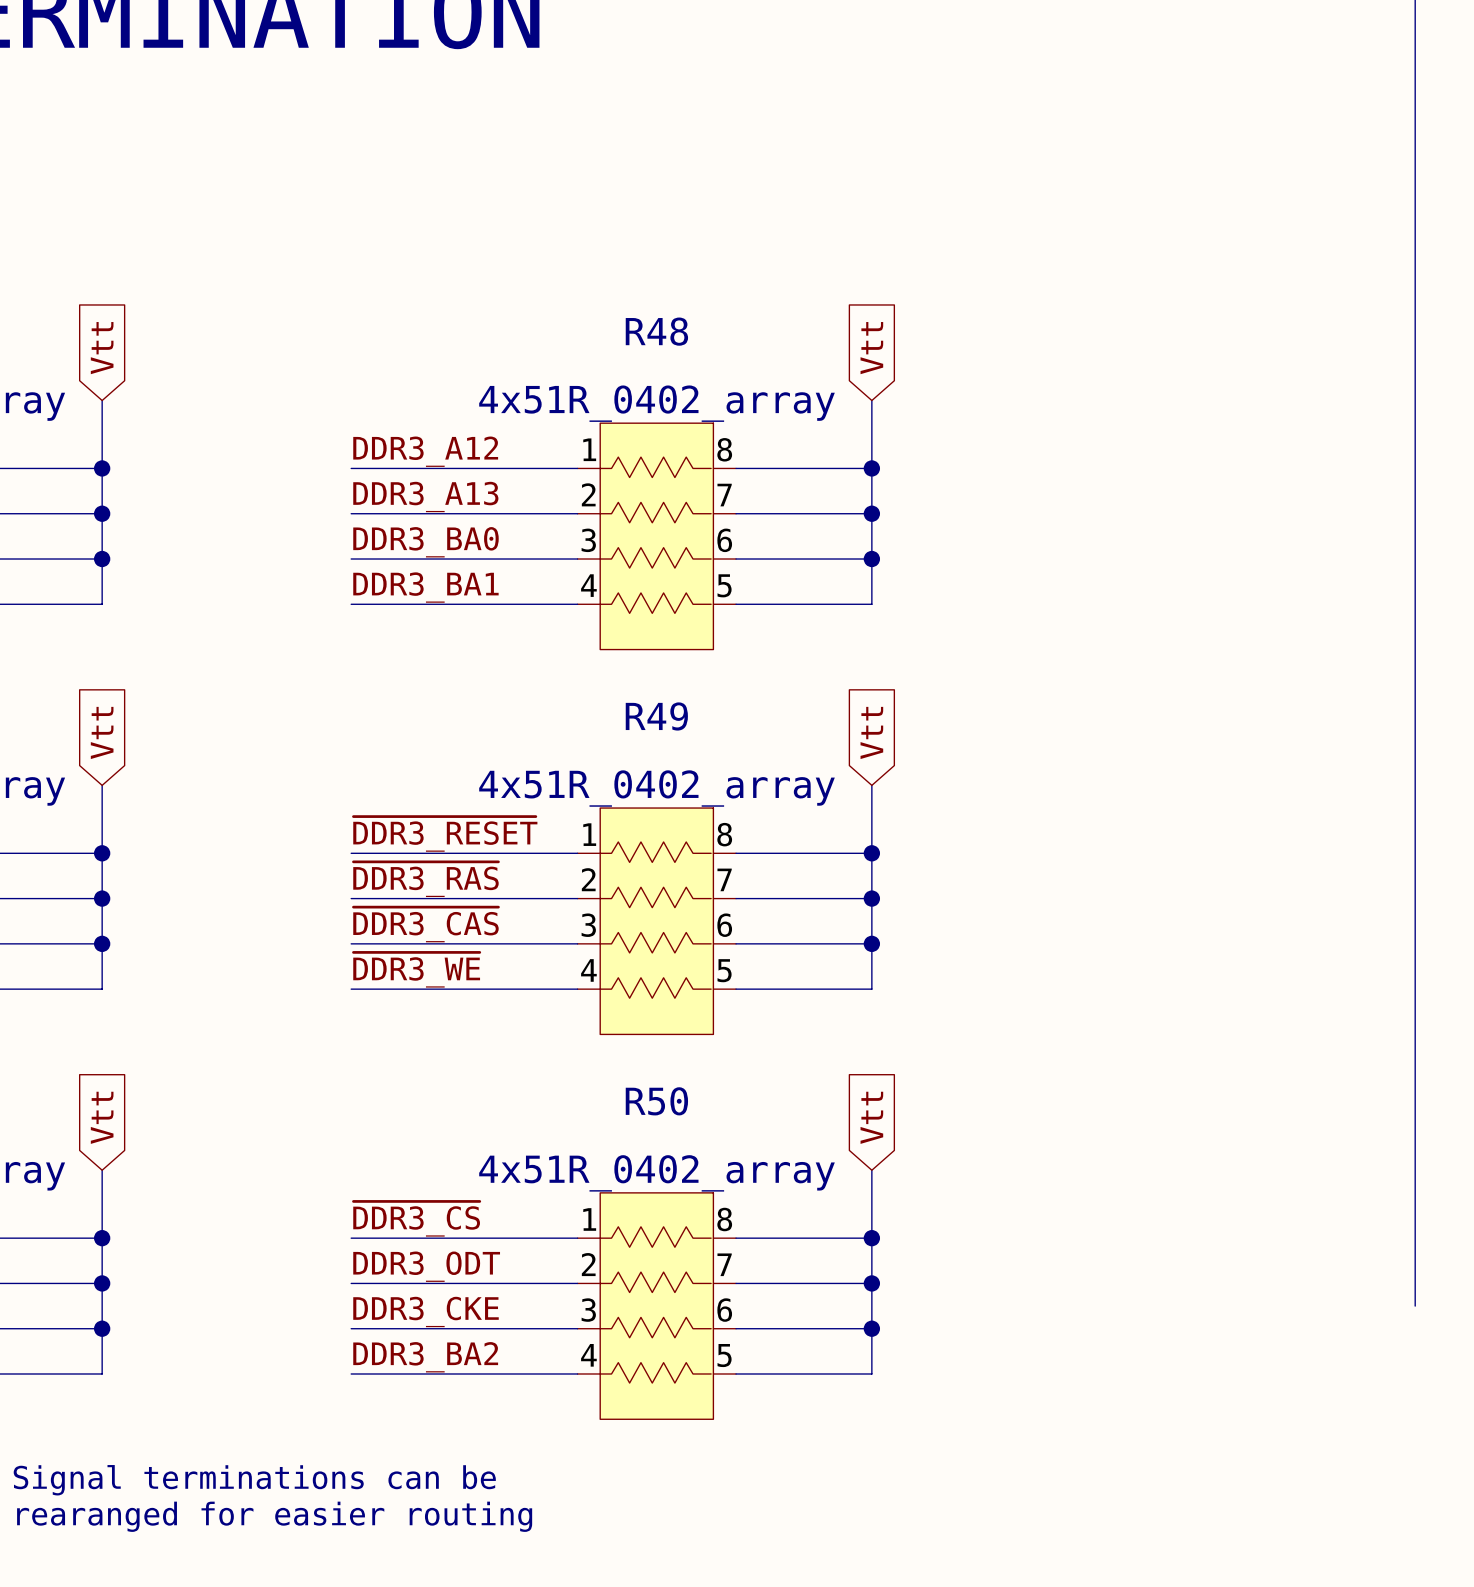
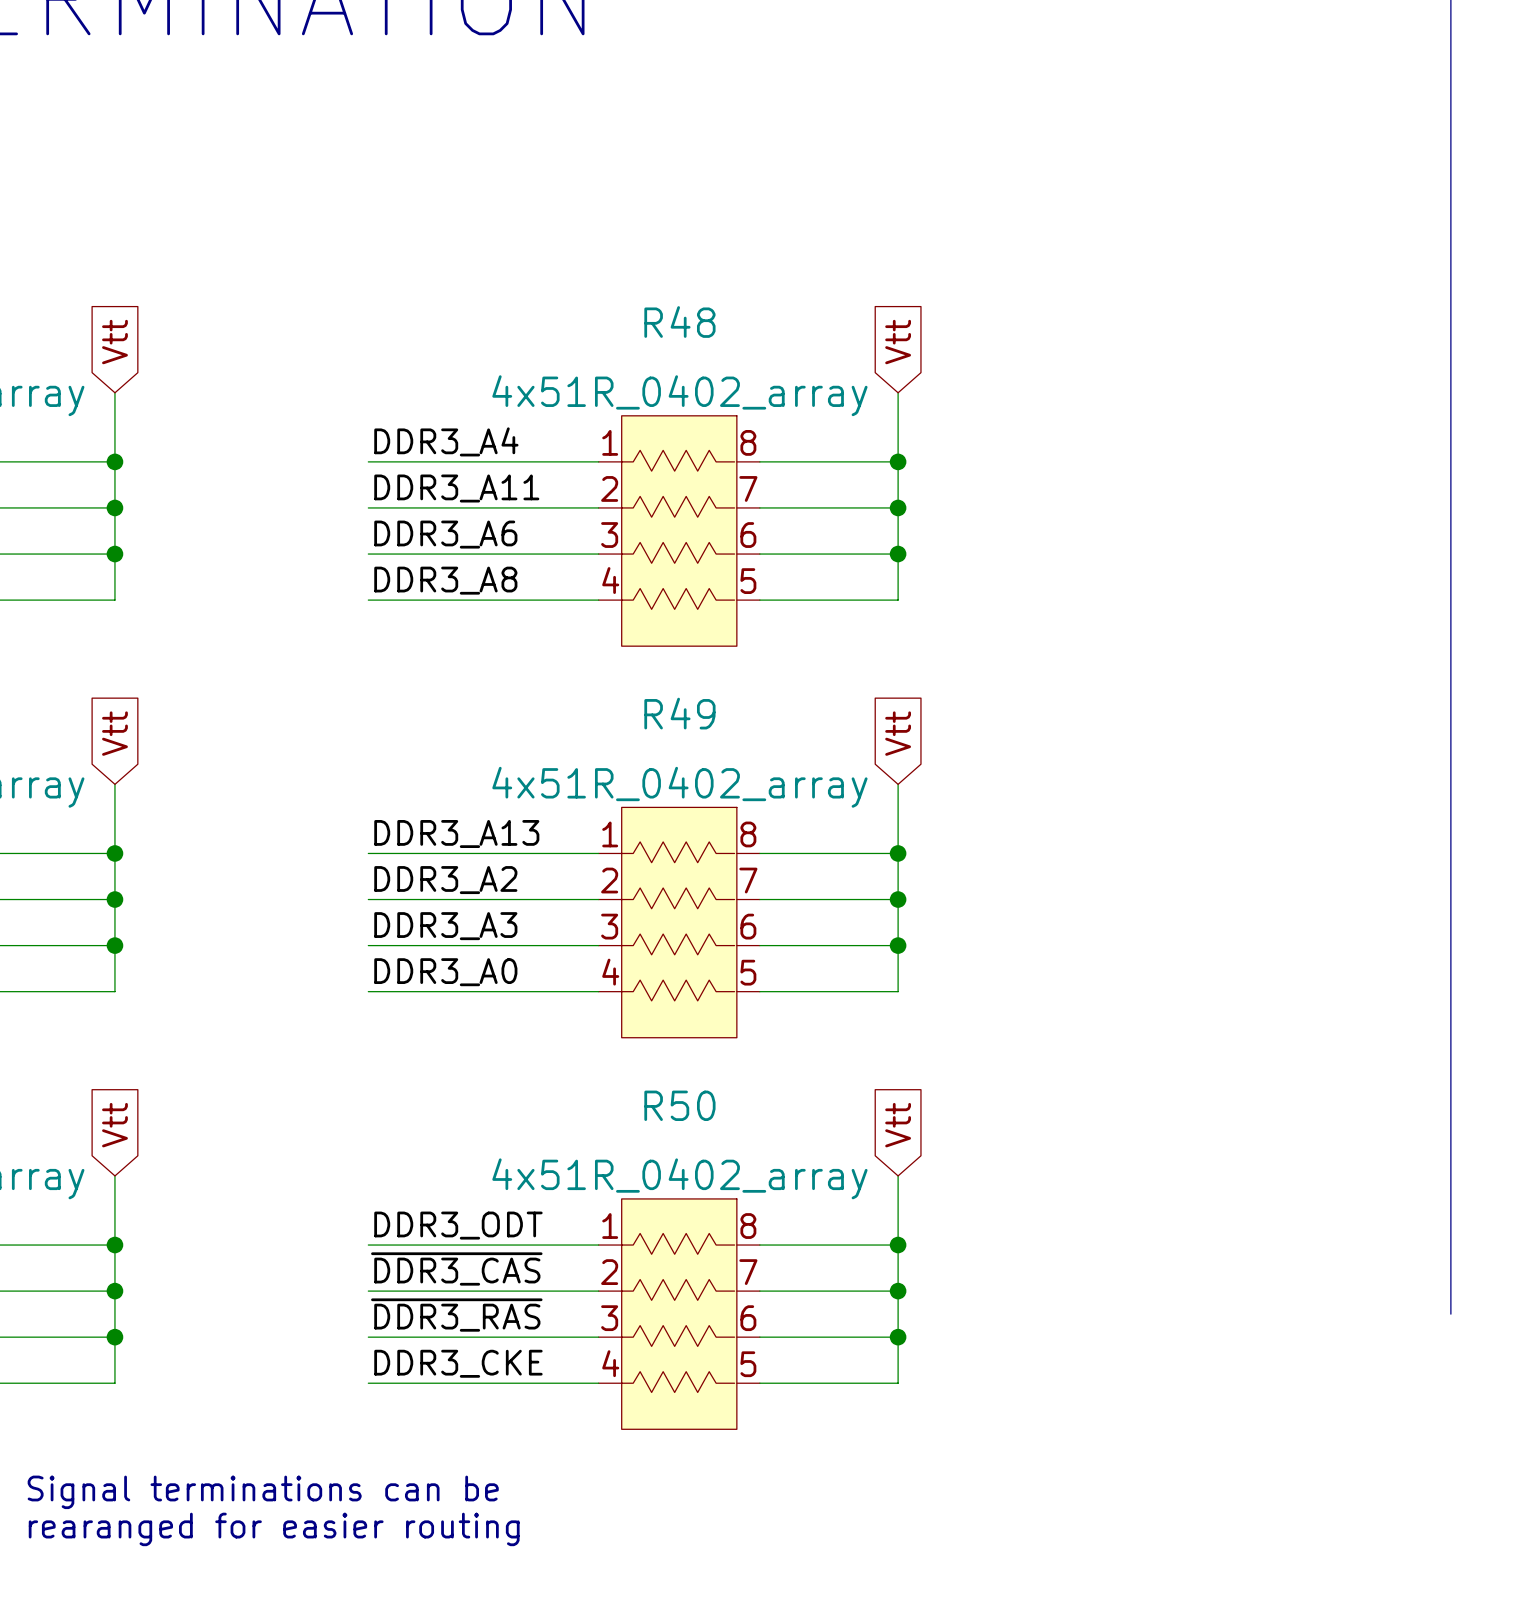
label: DDR3_A12 (425, 451) -> DDR3_A4 (446, 441)
label: DDR3_A13 (425, 496) -> DDR3_A11 (456, 488)
label: DDR3_BA0 (425, 542) -> DDR3_A6 (445, 534)
label: DDR3_BA1 (425, 587) -> DDR3_A8 (445, 580)
label: ~{DDR3_RESET} (445, 834) -> DDR3_A13 (456, 834)
label: ~{DDR3_RAS} (425, 879) -> DDR3_A2 (445, 880)
label: ~{DDR3_CAS} (425, 924) -> DDR3_A3 (445, 926)
label: ~{DDR3_WE} (416, 969) -> DDR3_A0 (445, 972)
label: ~{DDR3_CS} (416, 1219) -> DDR3_ODT (458, 1225)
label: DDR3_ODT (426, 1266) -> ~{DDR3_CAS} (456, 1268)
label: DDR3_CKE (426, 1311) -> ~{DDR3_RAS} (456, 1315)
label: DDR3_BA2 (425, 1357) -> DDR3_CKE (458, 1363)

